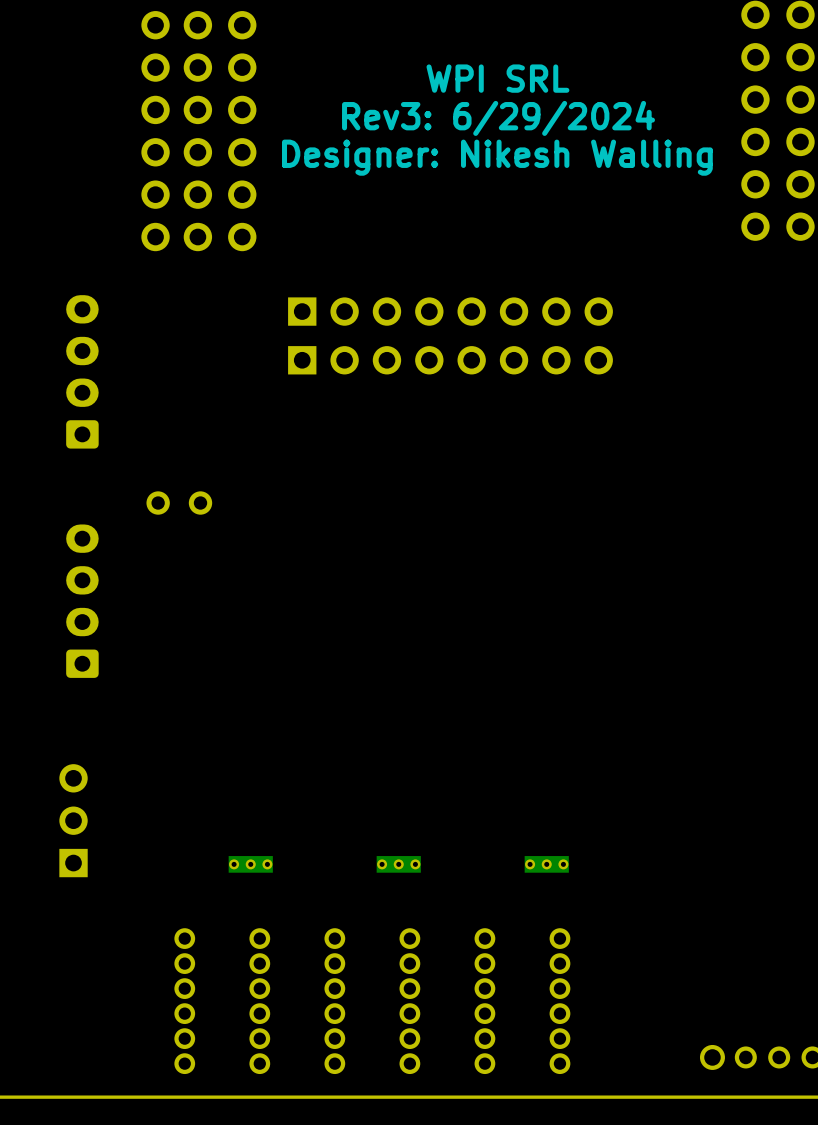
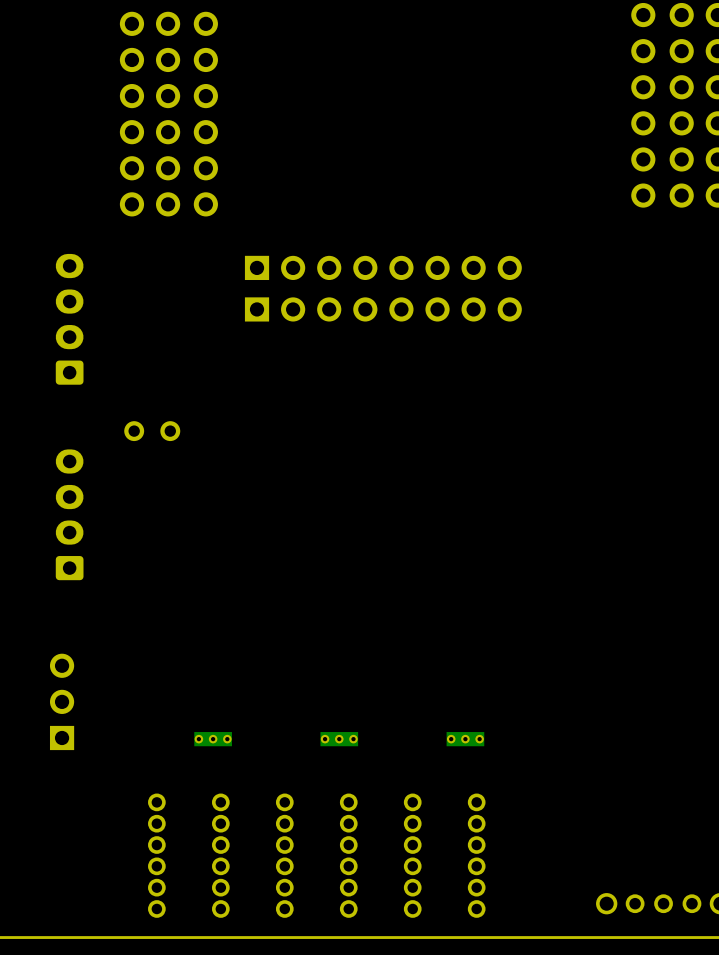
text: WPI SRL (497, 78) -> none
text: Rev3: 6/29/2024 (498, 118) -> none
text: Designer: Nikesh Walling (497, 157) -> none

